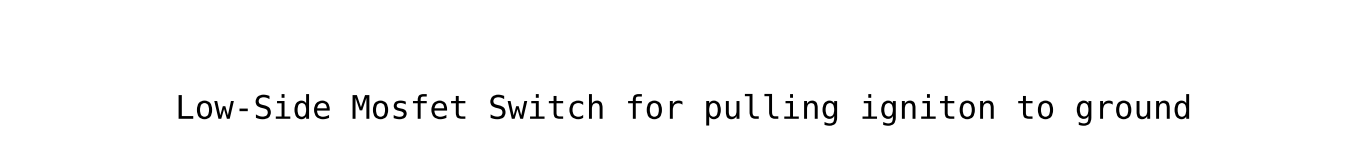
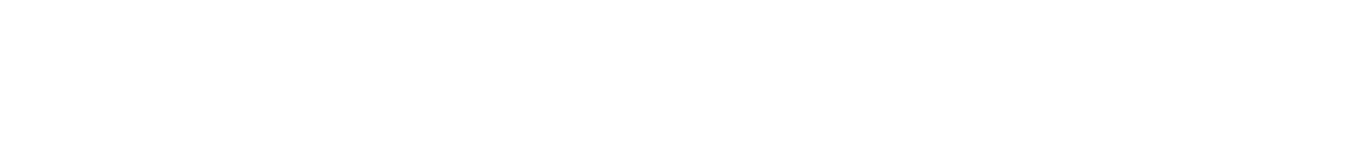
text: Low-Side Mosfet Switch for pulling igniton to ground (683, 109) -> none

